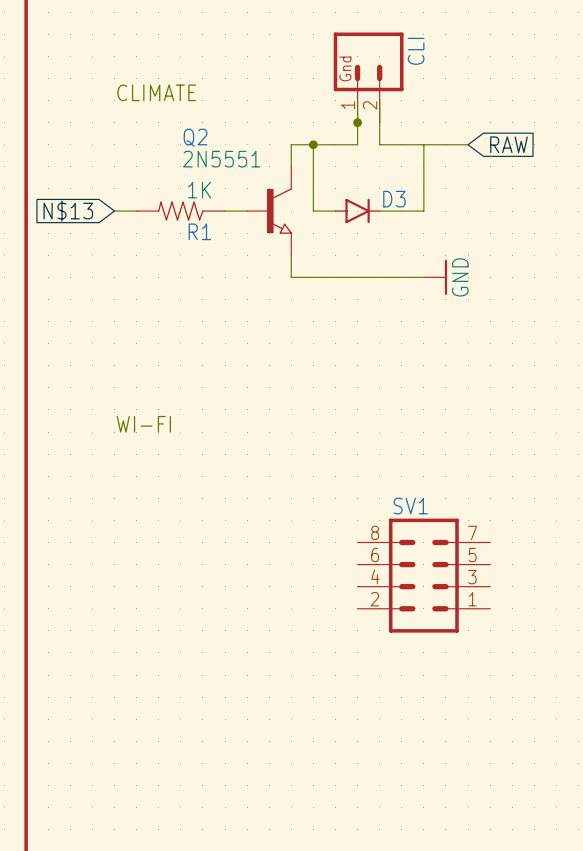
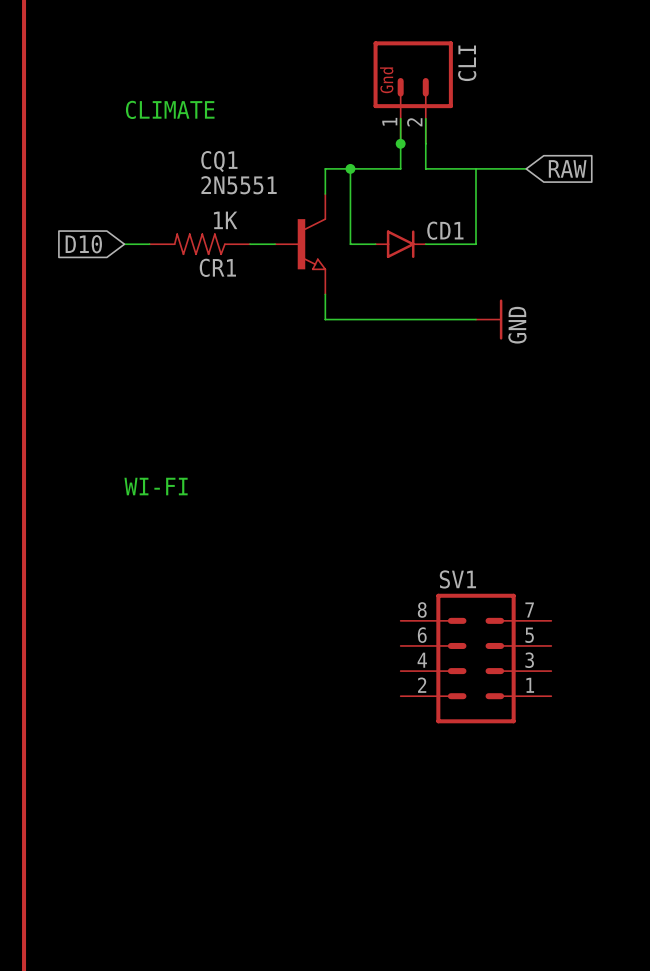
Q2 name: Q2 (195, 137) -> CQ1 (219, 161)
D3 name: D3 (394, 199) -> CD1 (445, 230)
global label: N$13 (68, 211) -> D10 (83, 244)
R1 name: R1 (199, 231) -> CR1 (217, 267)

